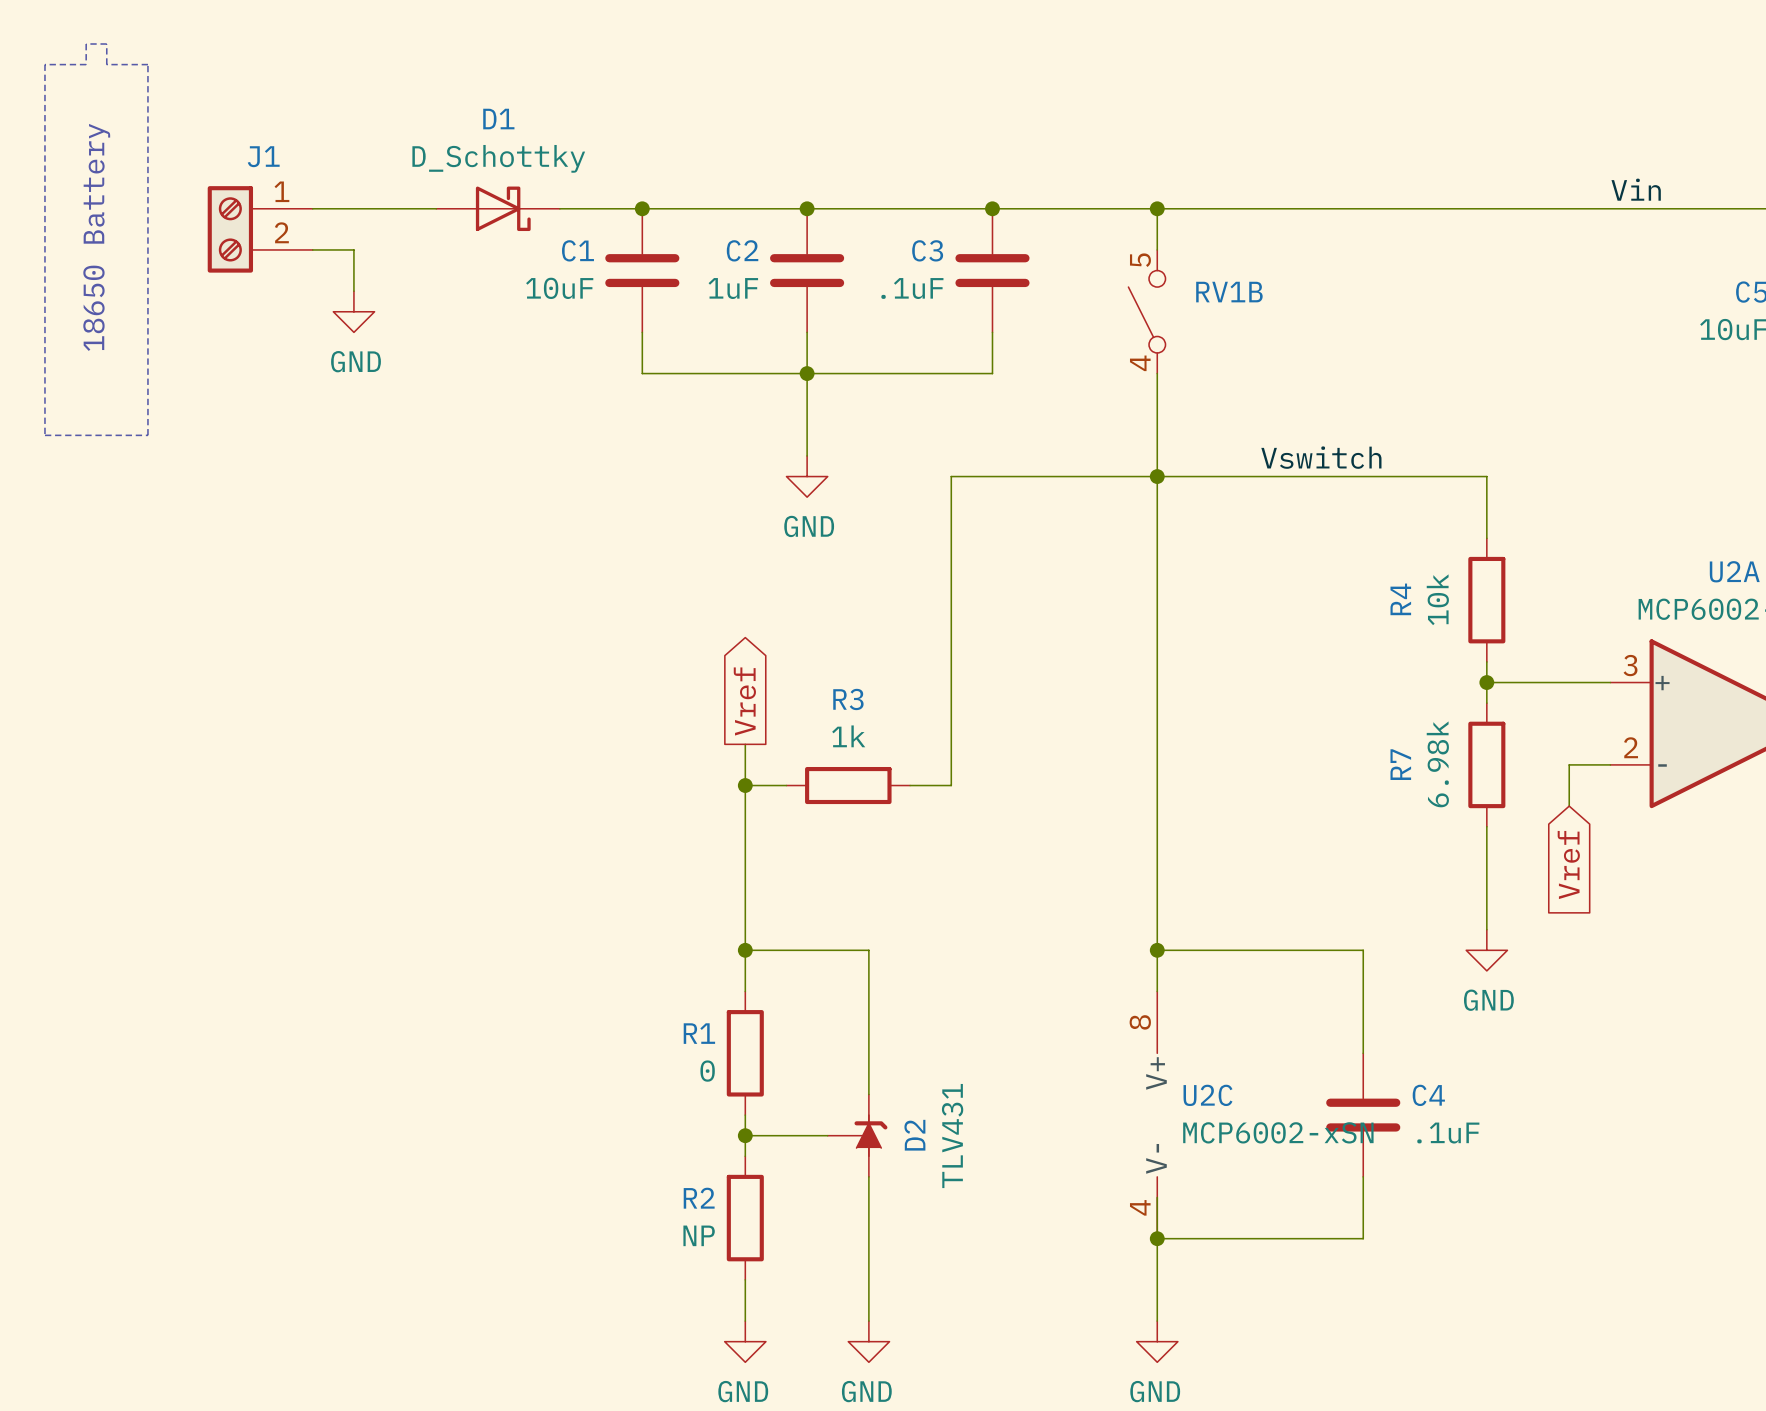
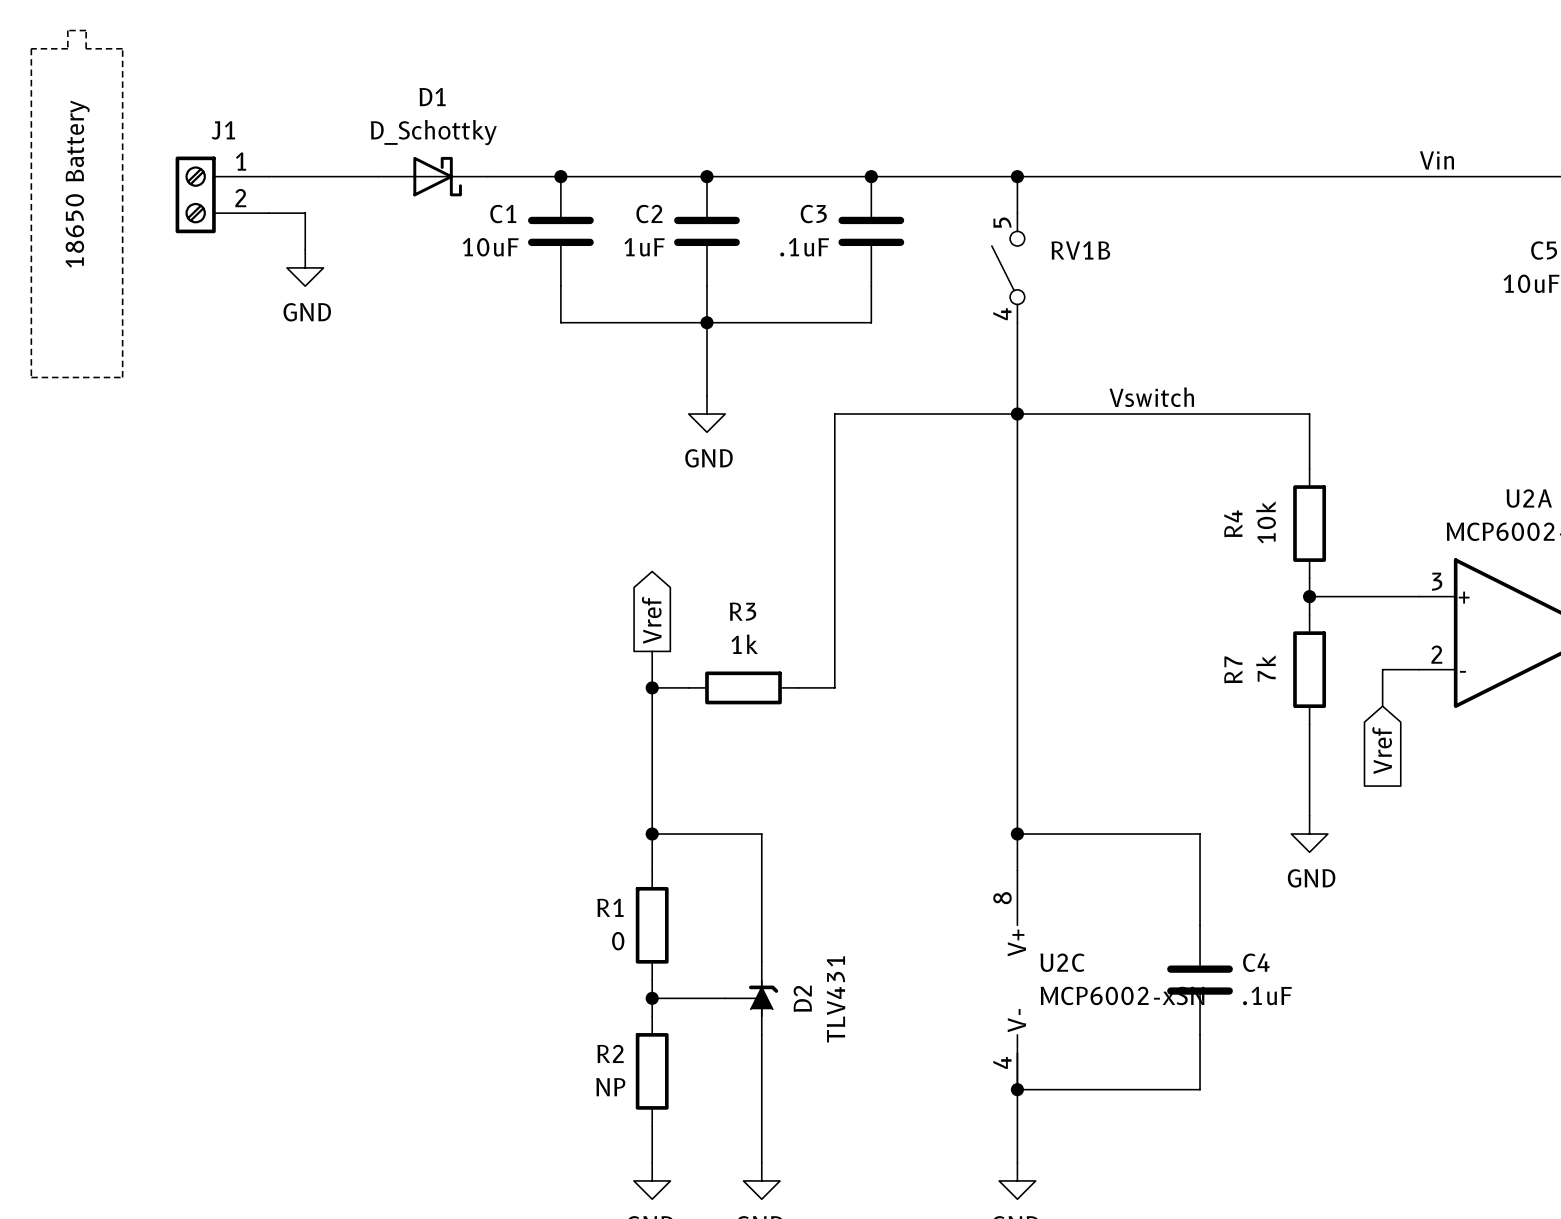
R7 value: 6.98k (1437, 764) -> 7k (1265, 668)

